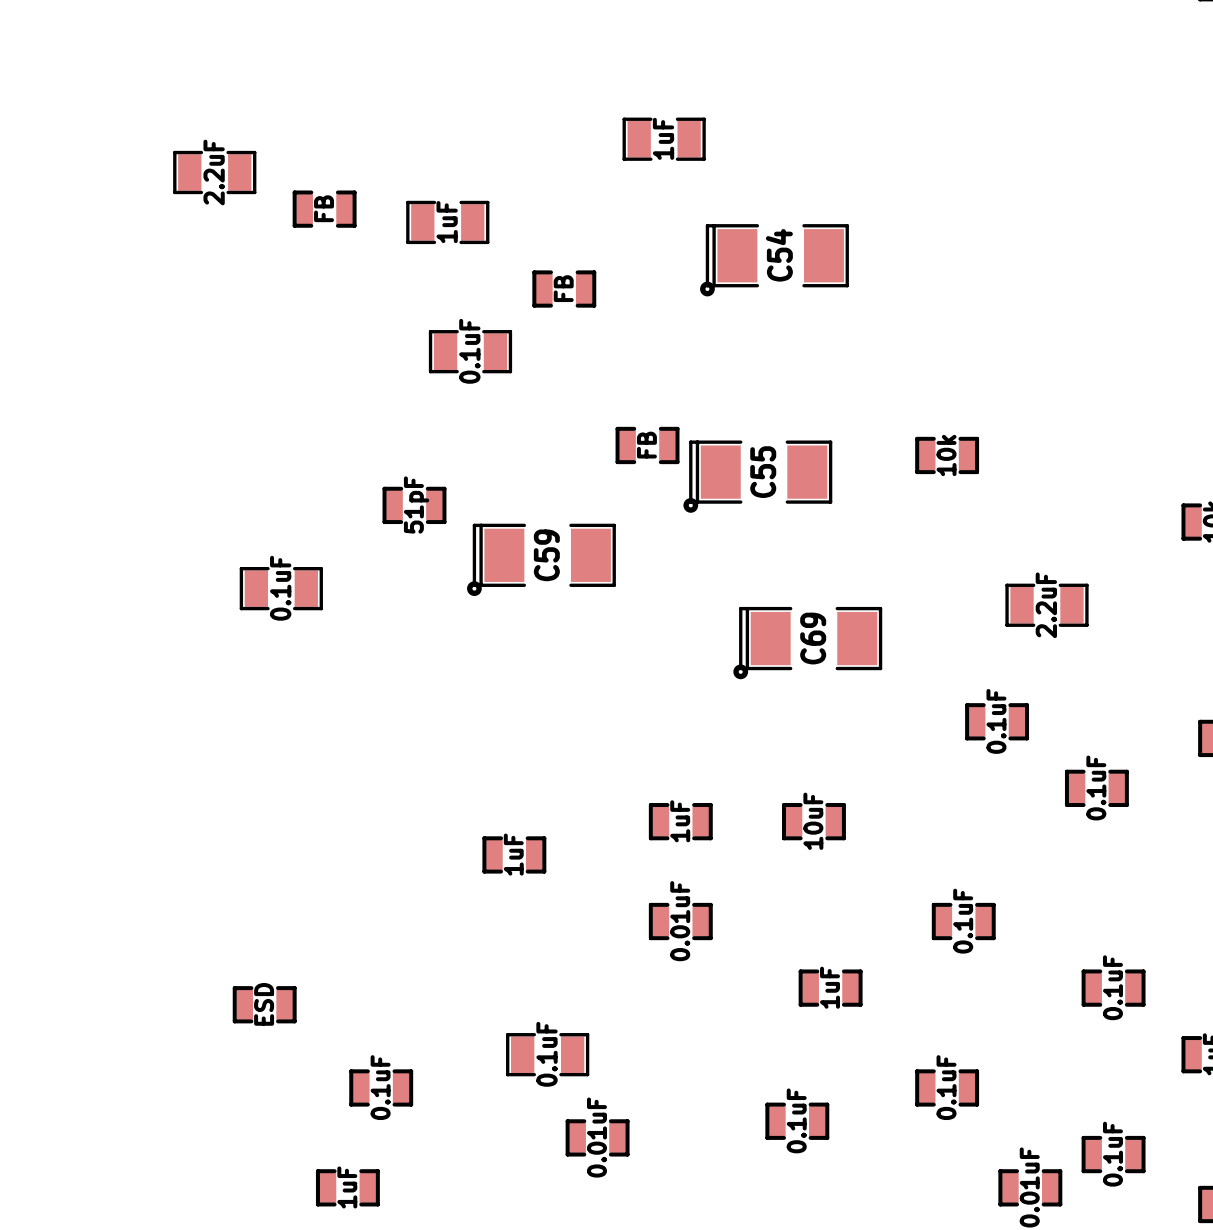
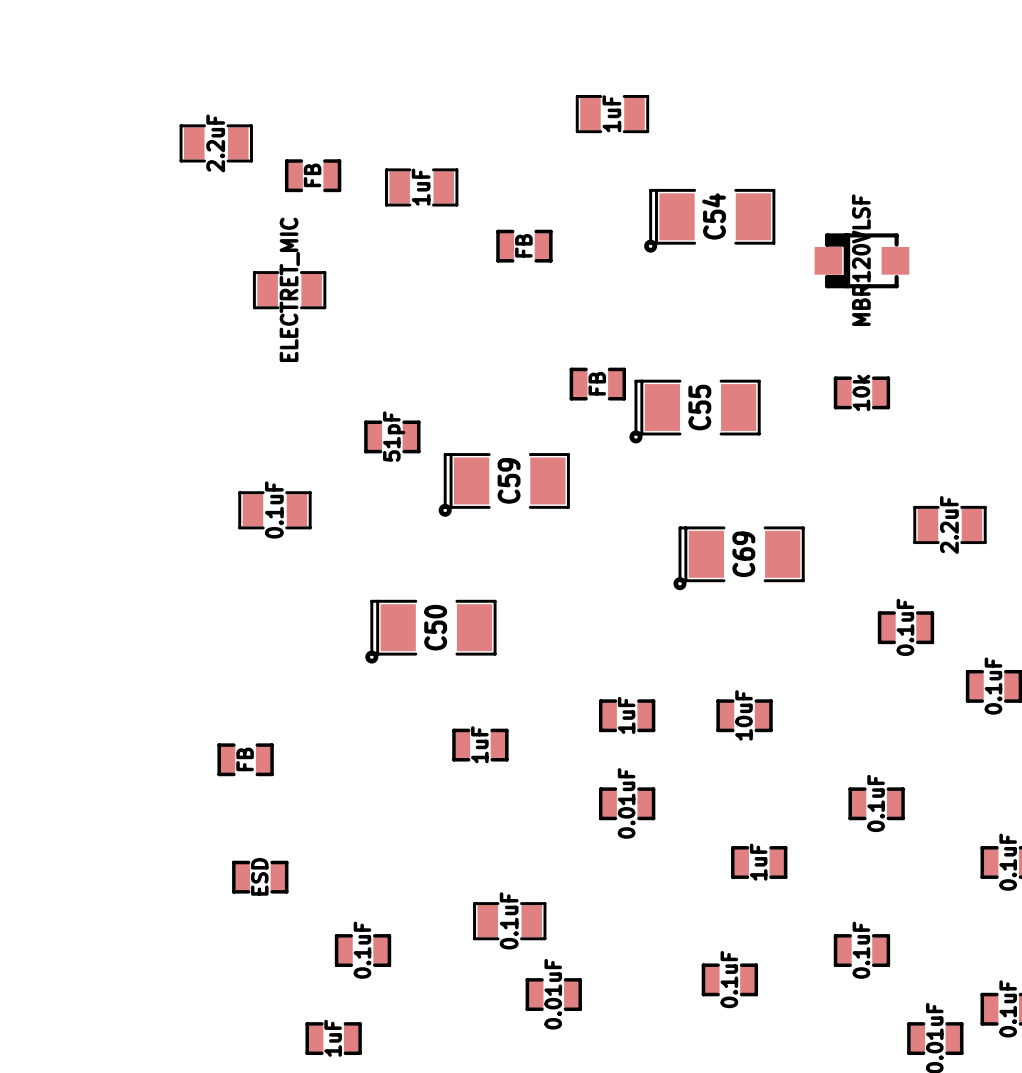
part: none -> MBR120VLSF (861, 260)
part: none -> ELECTRET_MIC (289, 290)
part: 0.1uF (470, 351) -> none
C50: none -> (430, 631)
part: none -> FB (245, 759)

